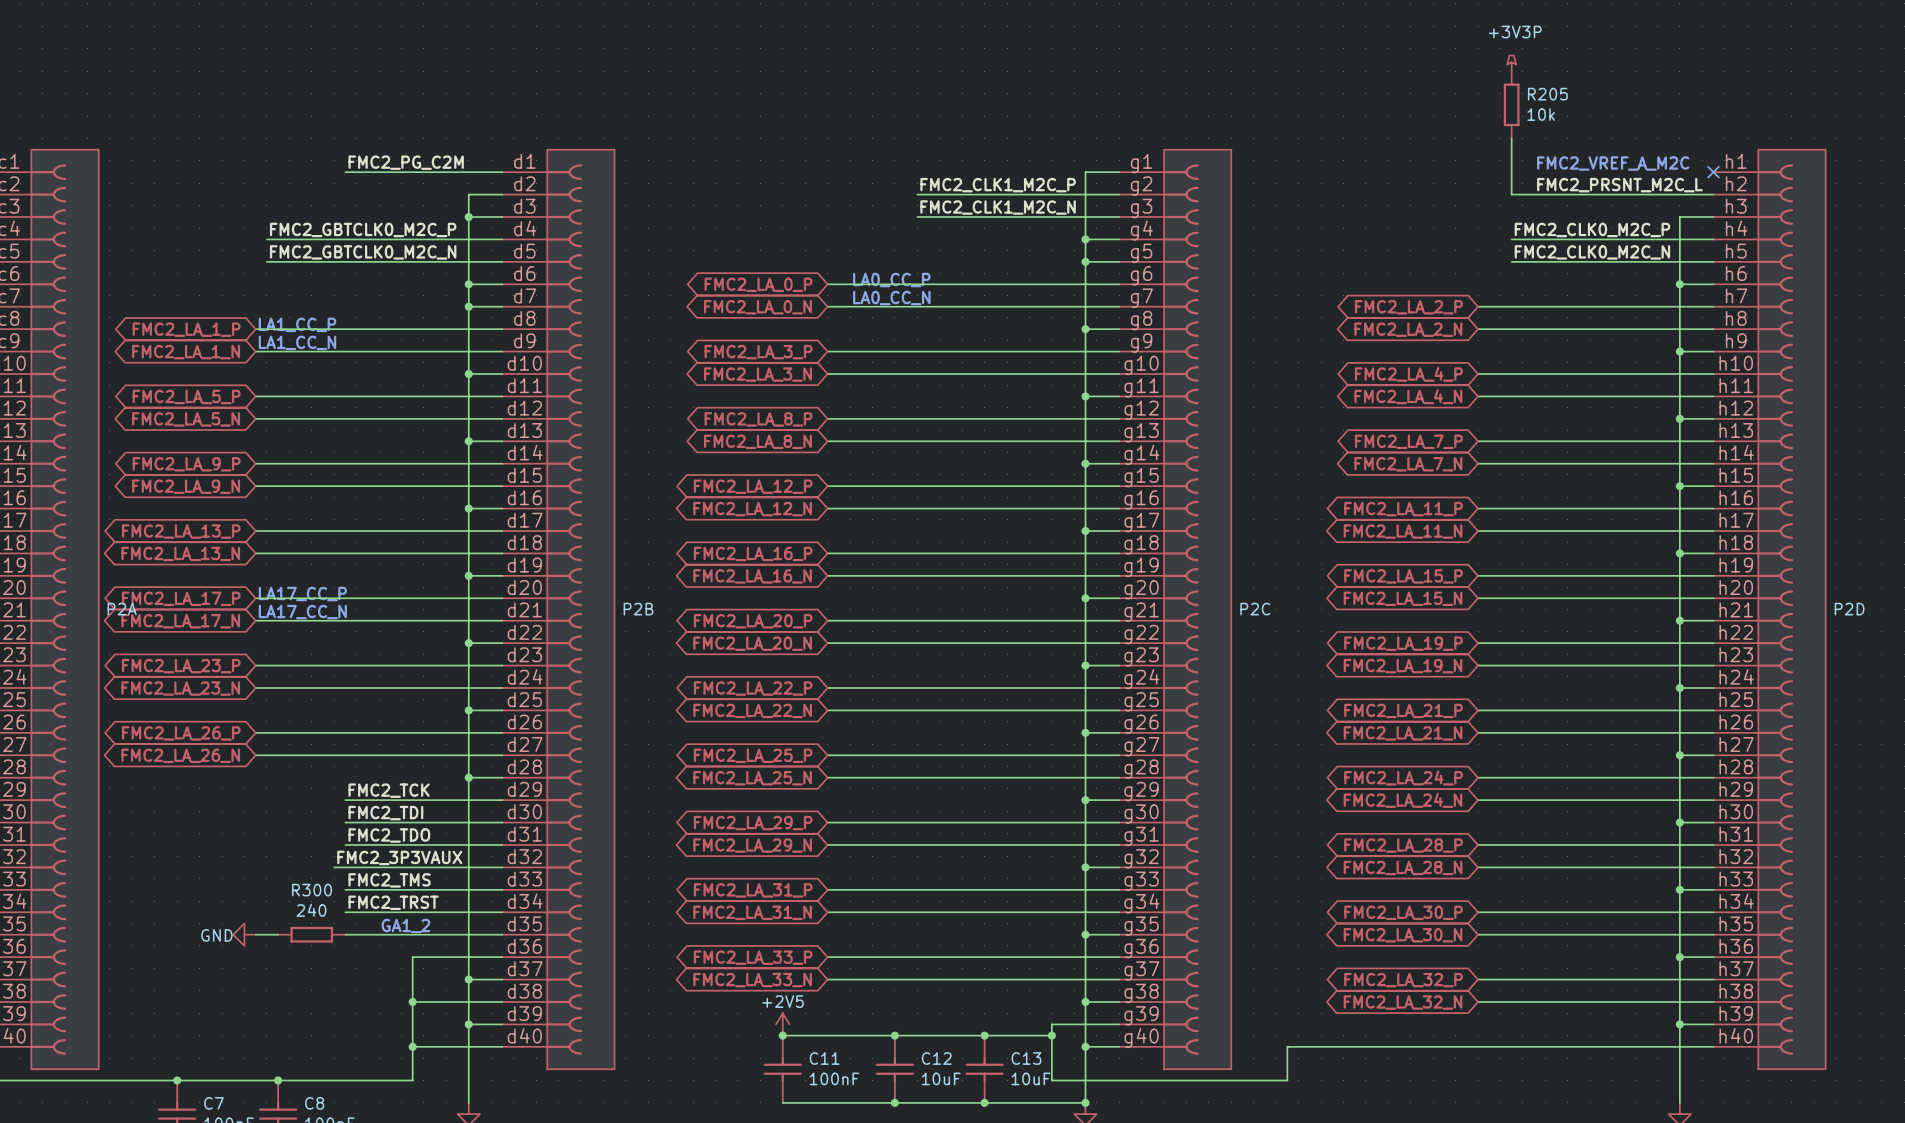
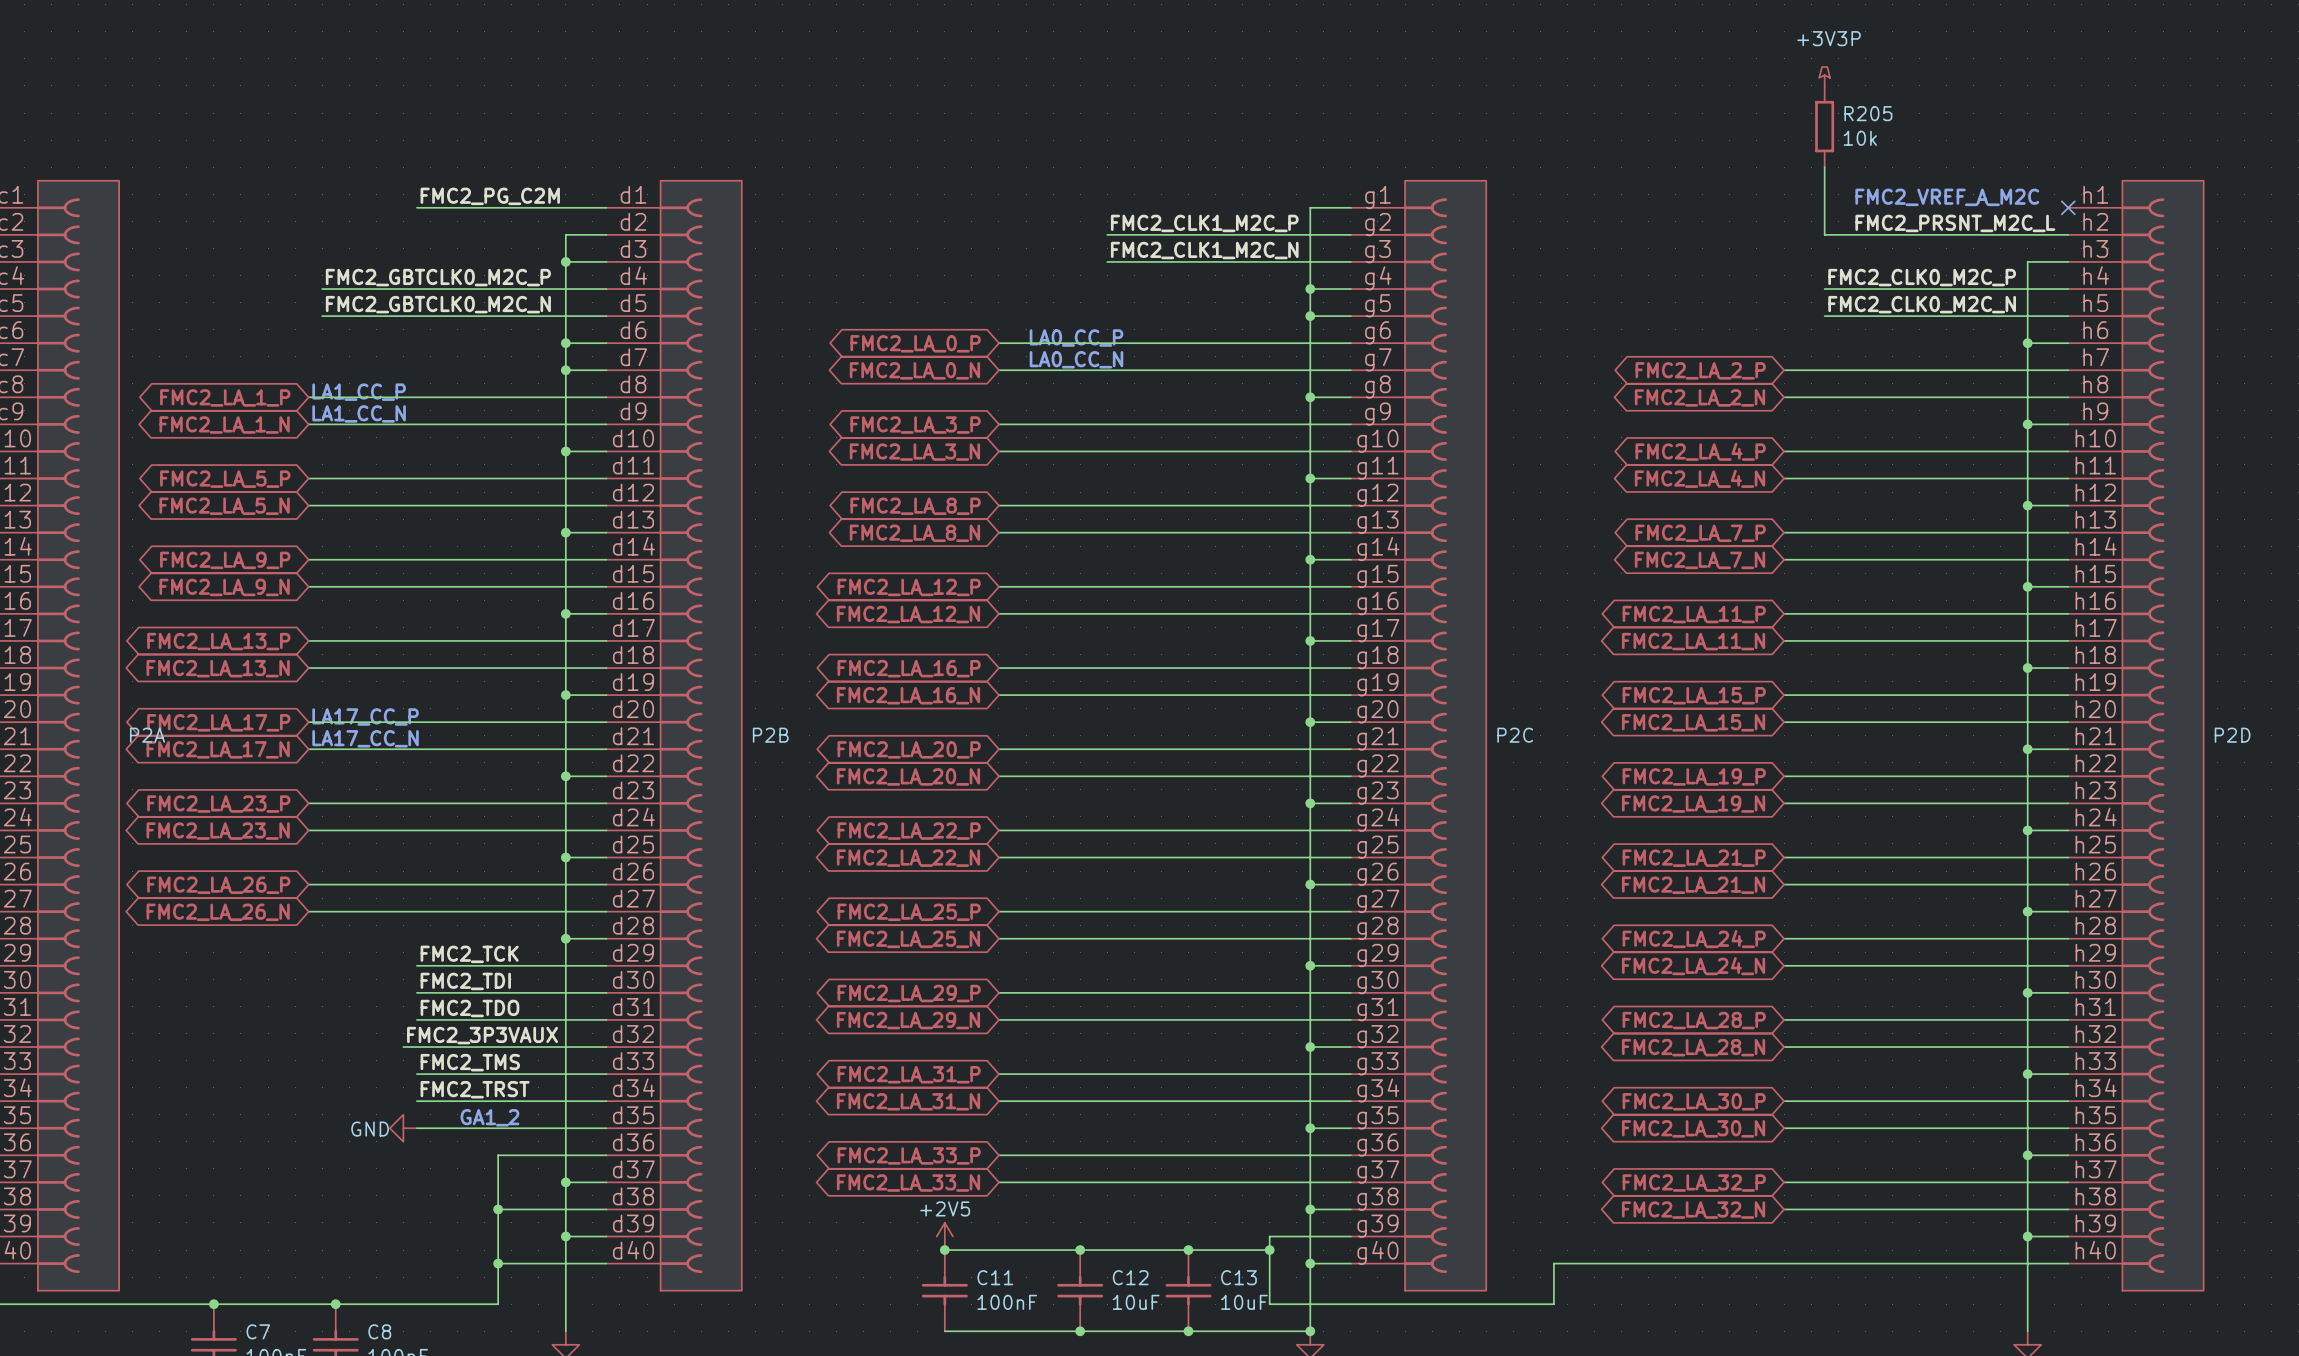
power symbol position: GND (244, 934) -> GND (403, 1128)
wire: (255, 934) (278, 934) -> none
R300: (311, 934) -> none

